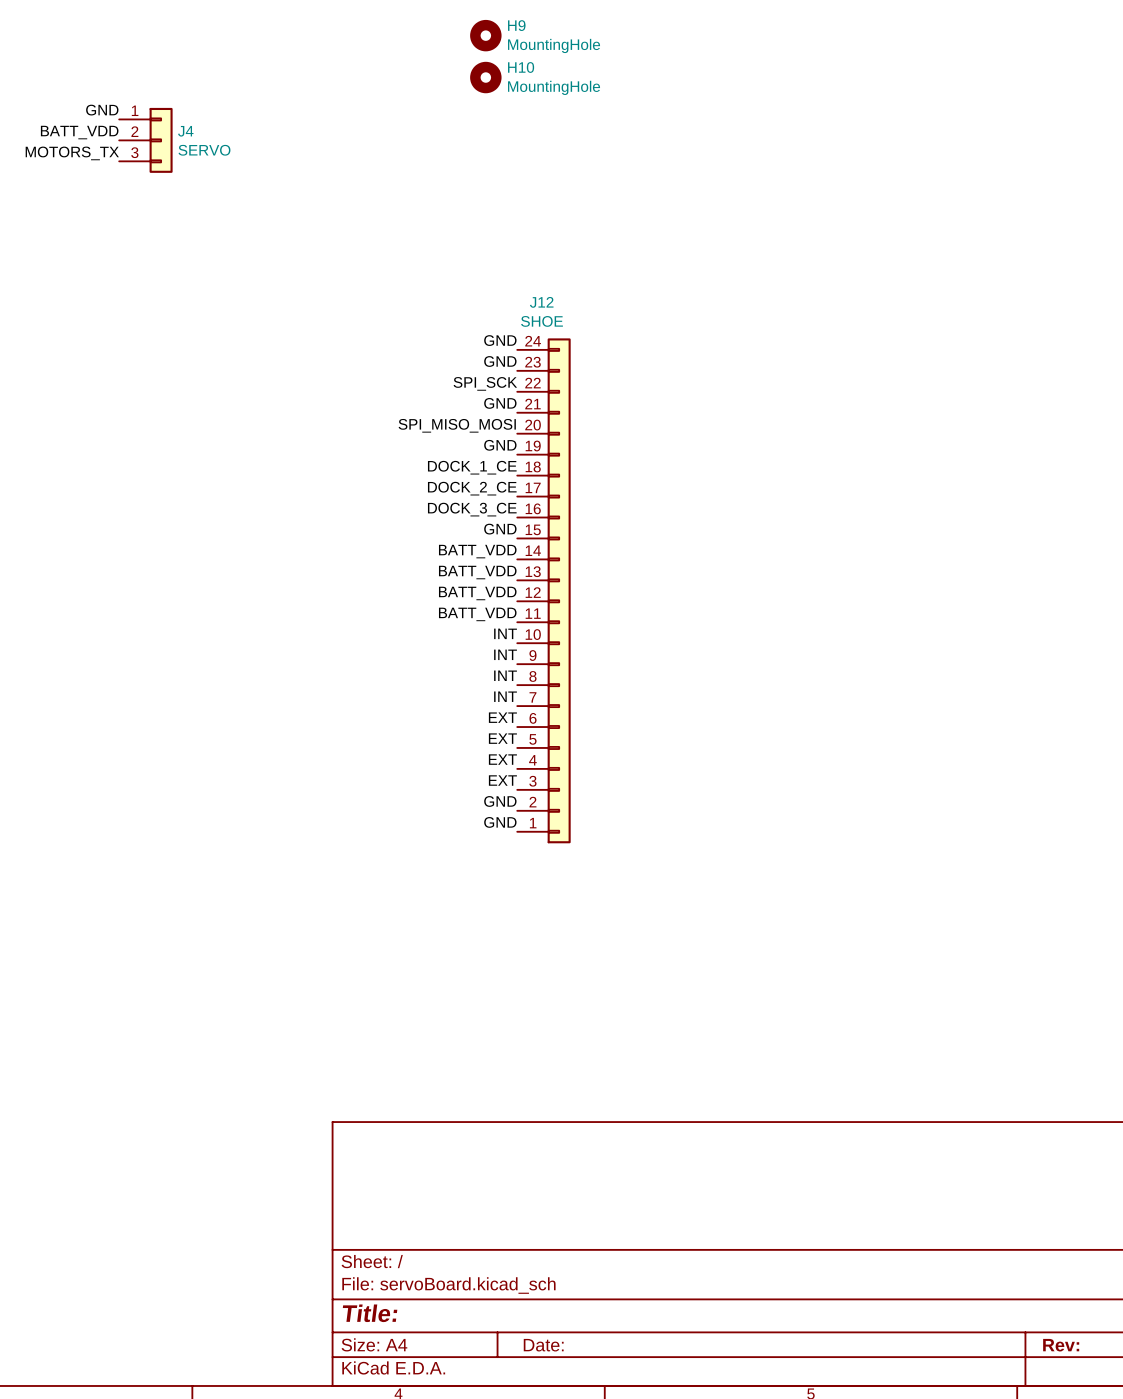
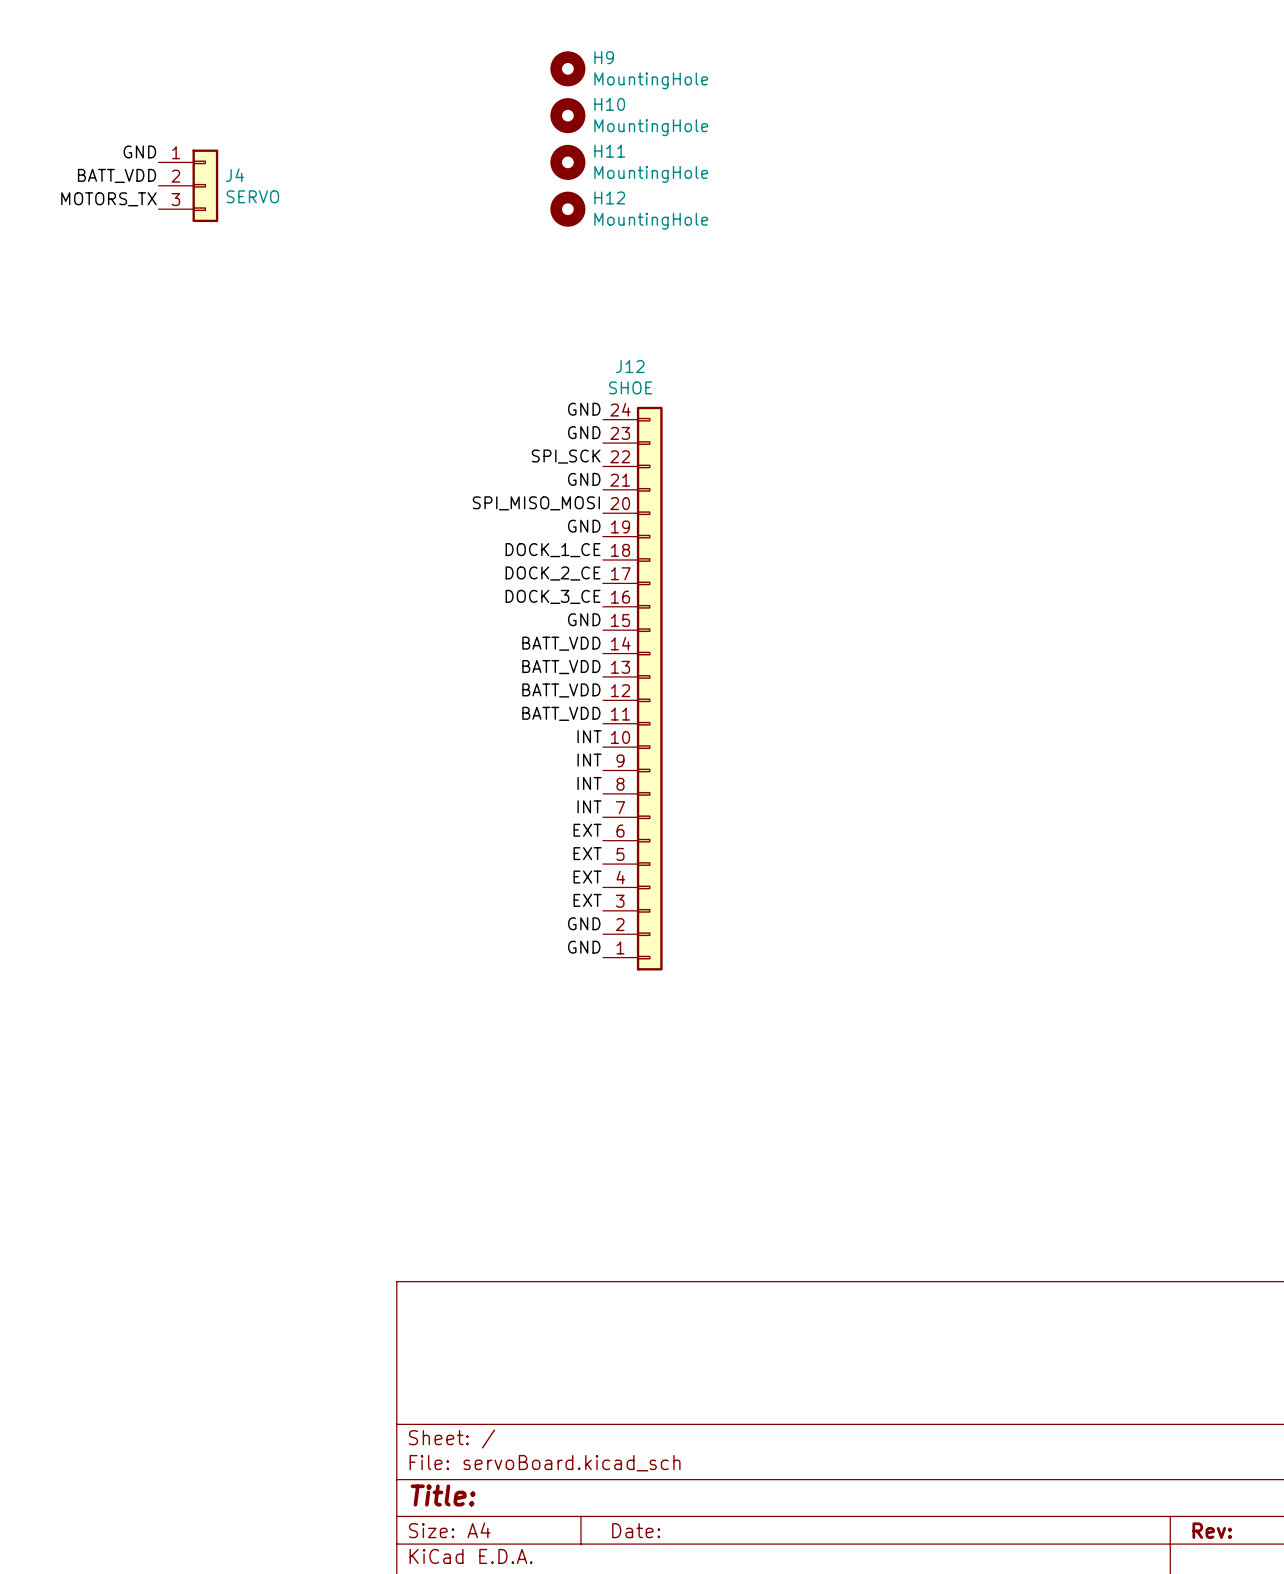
H11: none -> MountingHole (567, 162)
H12: none -> MountingHole (567, 209)

